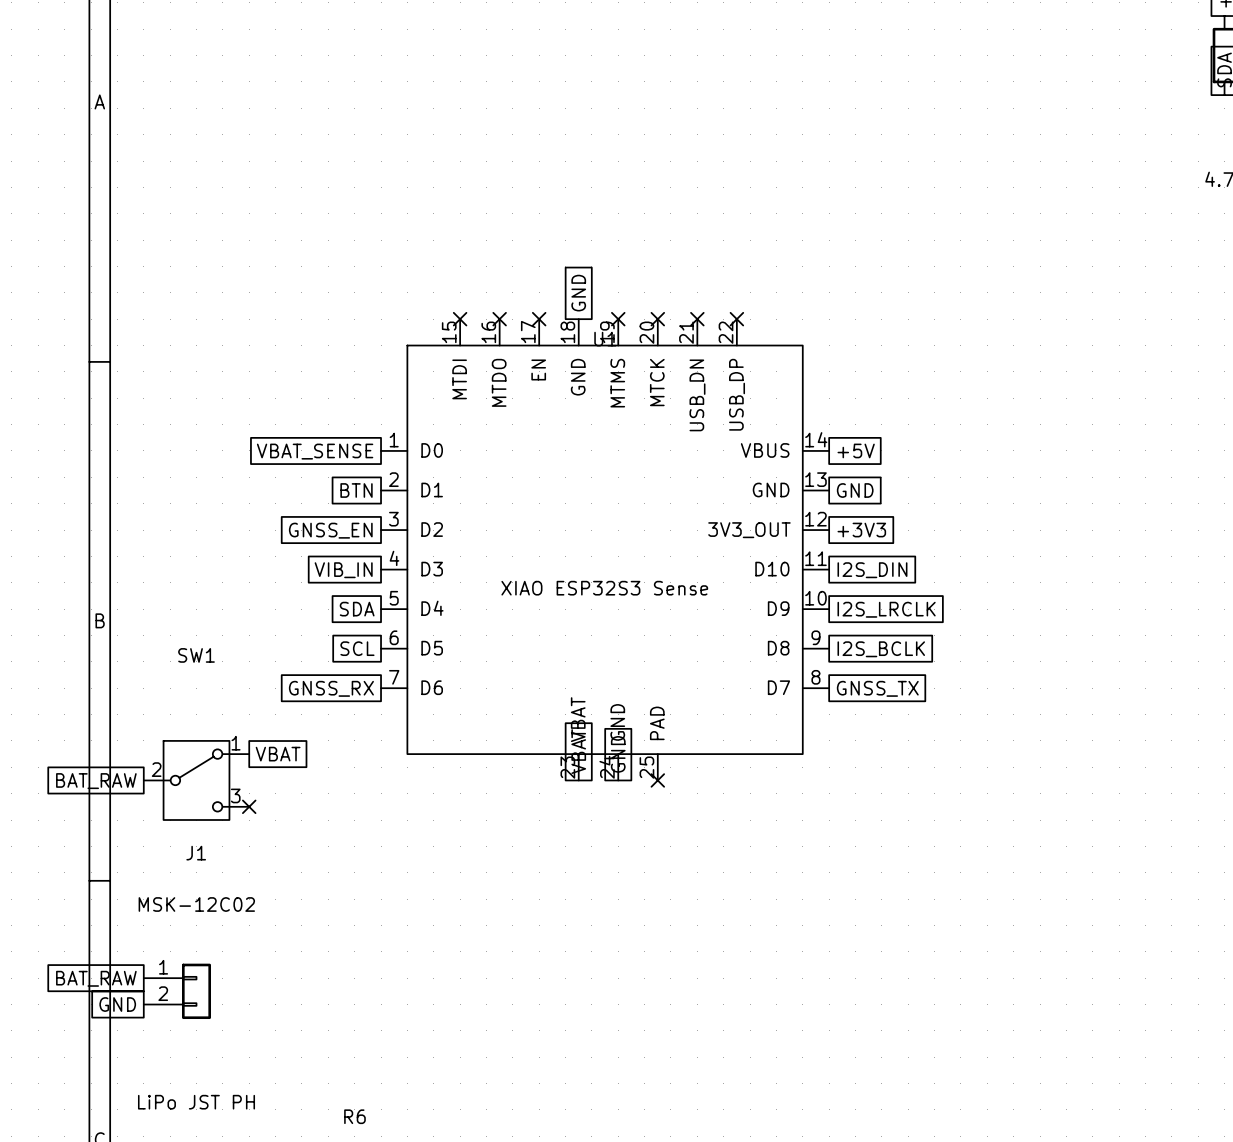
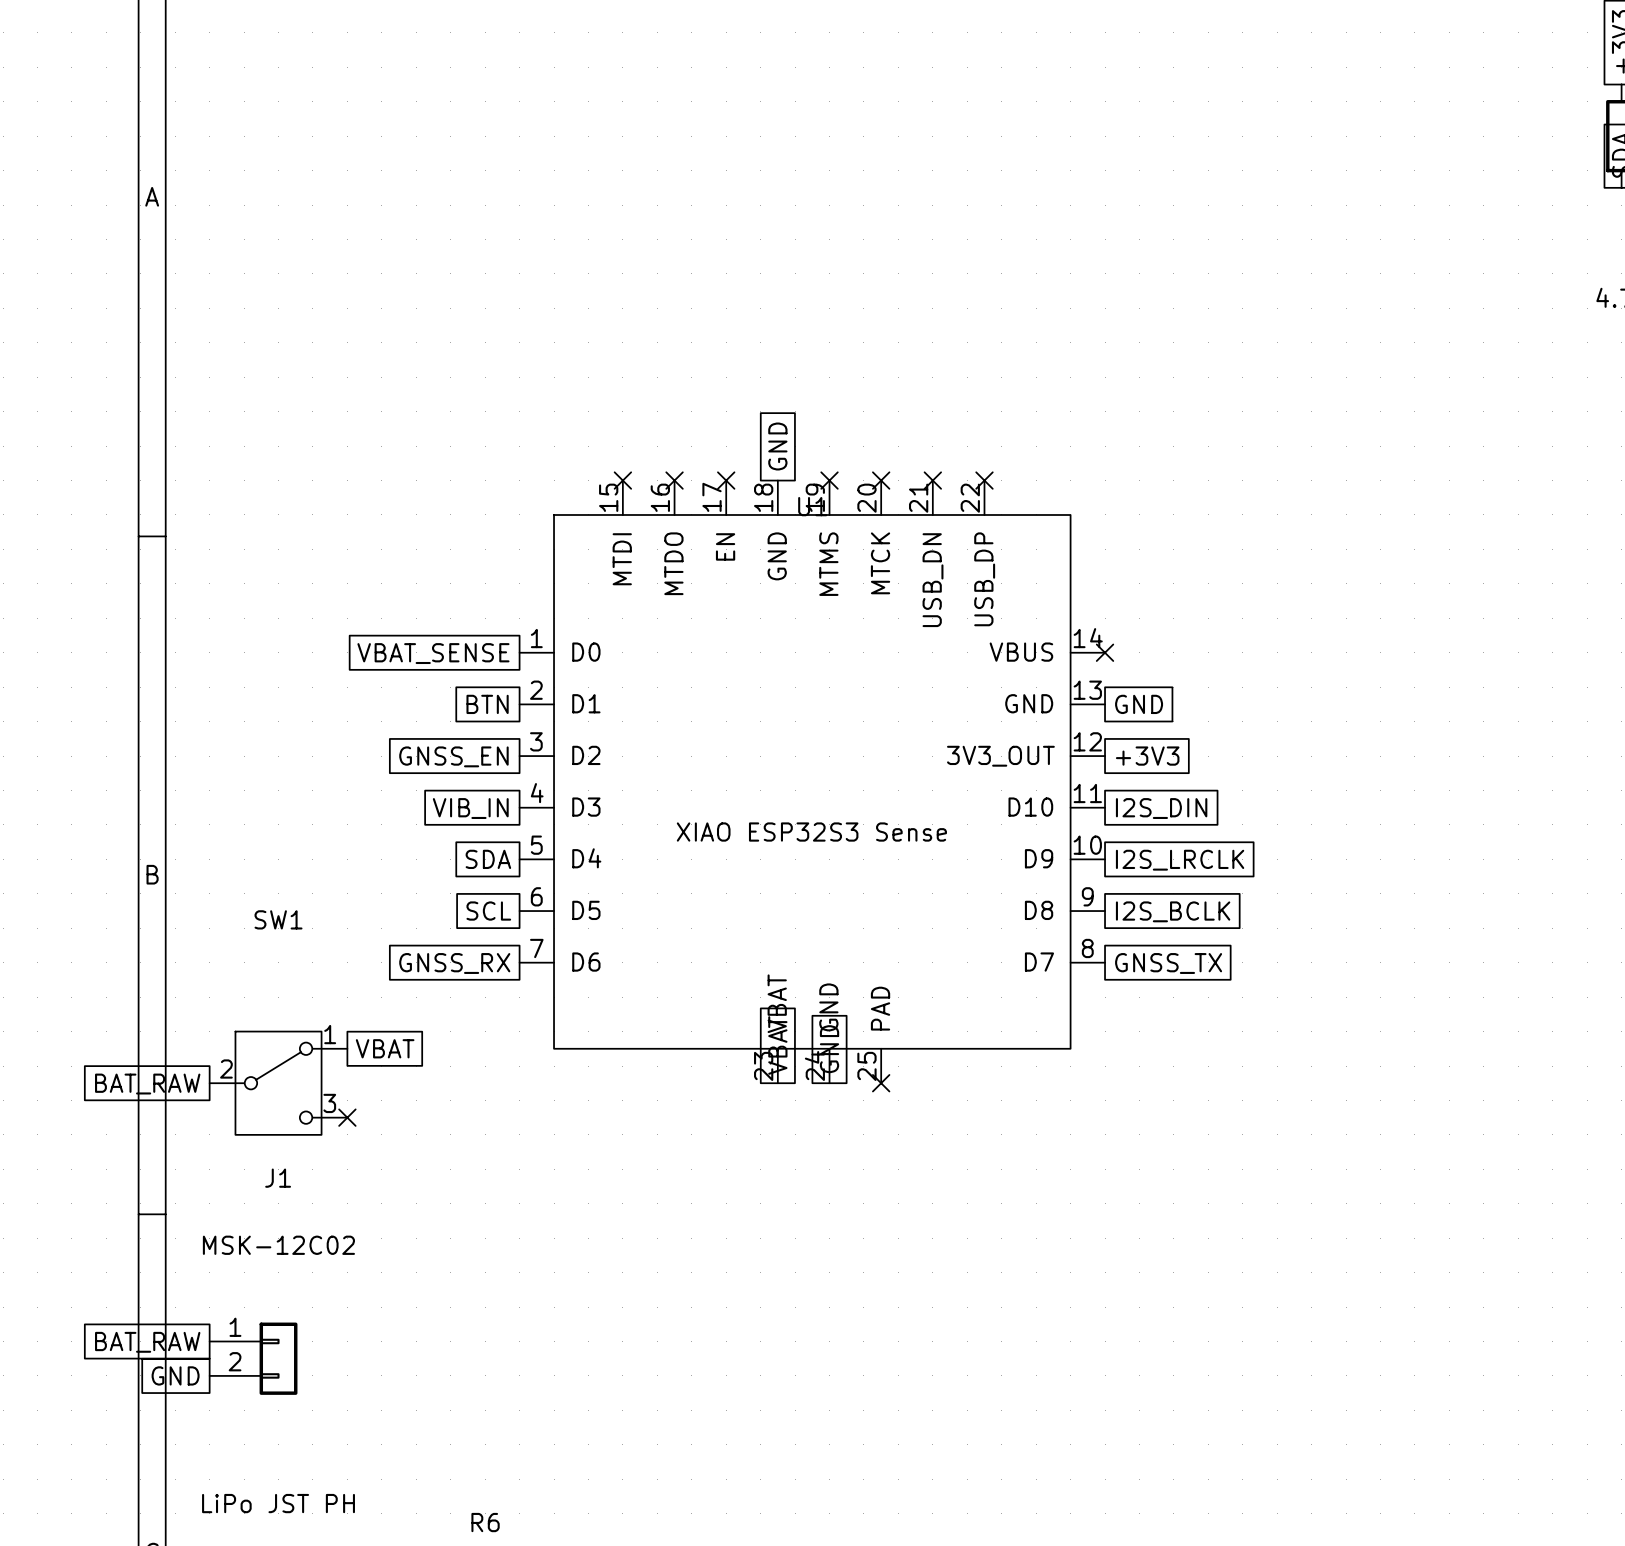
no-connect mark: none -> (1105, 652)
global label: +5V (856, 450) -> none

